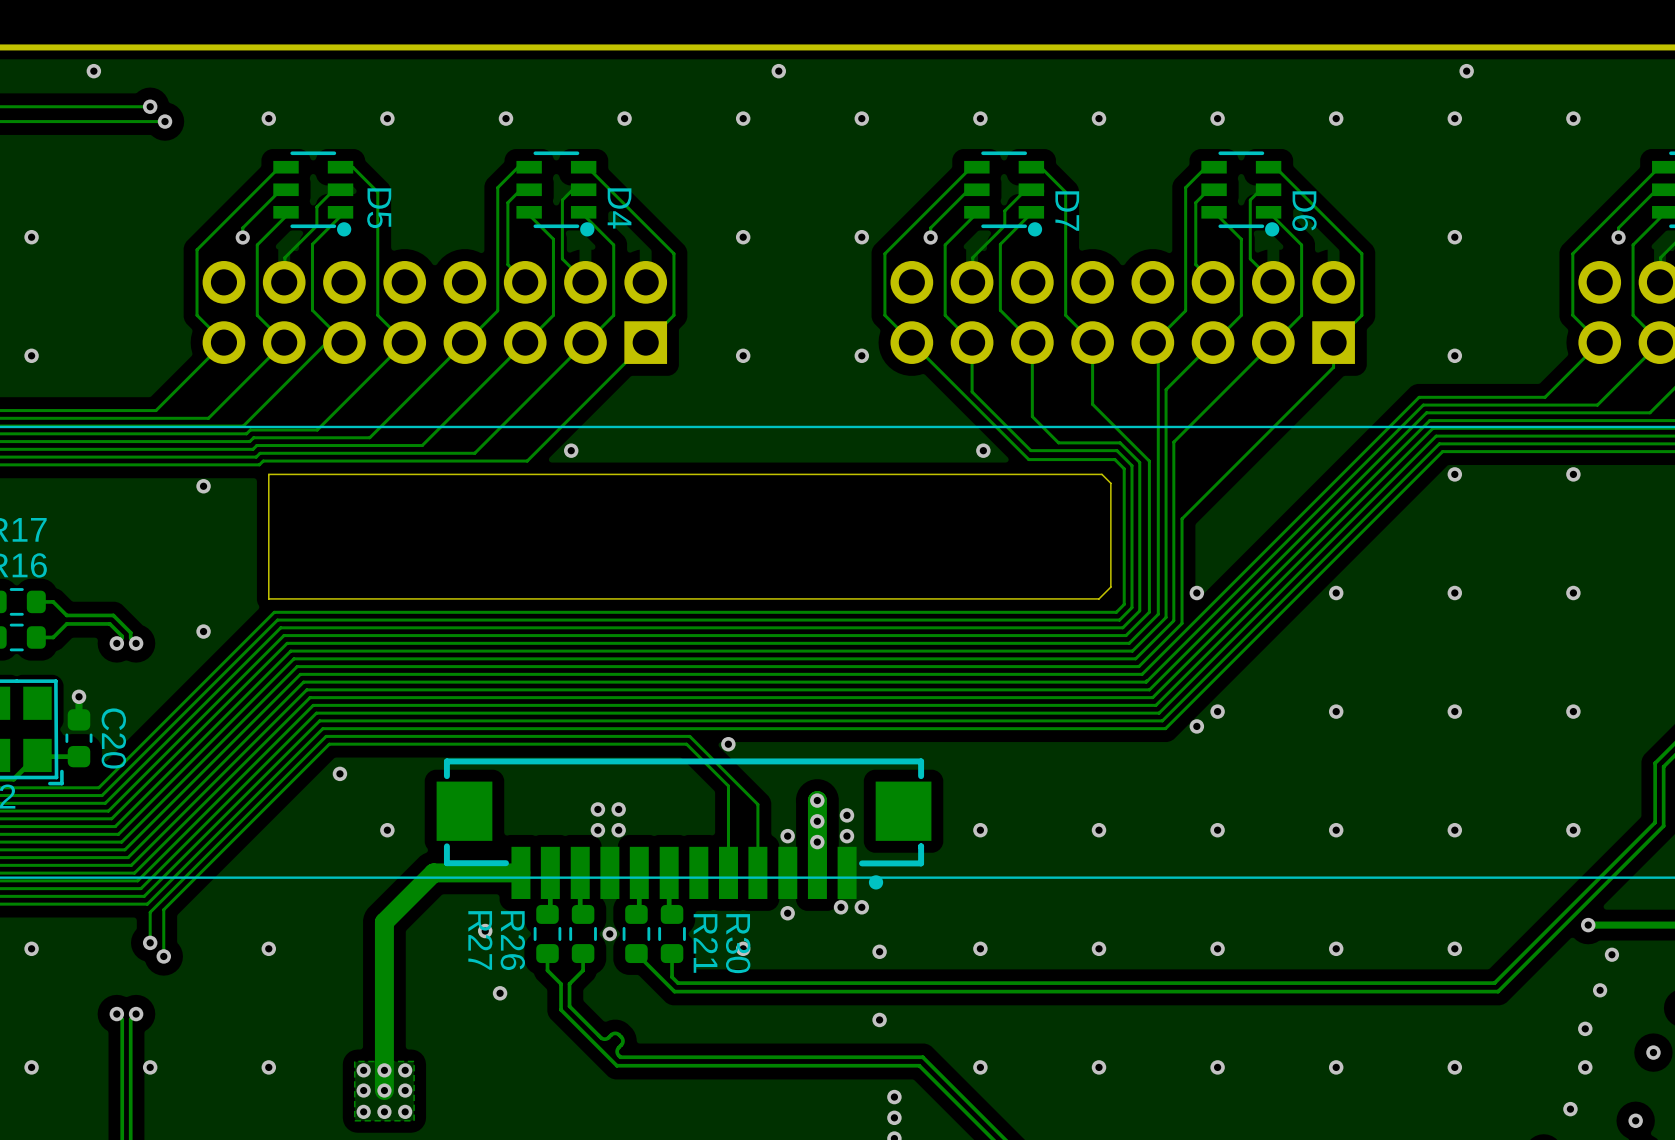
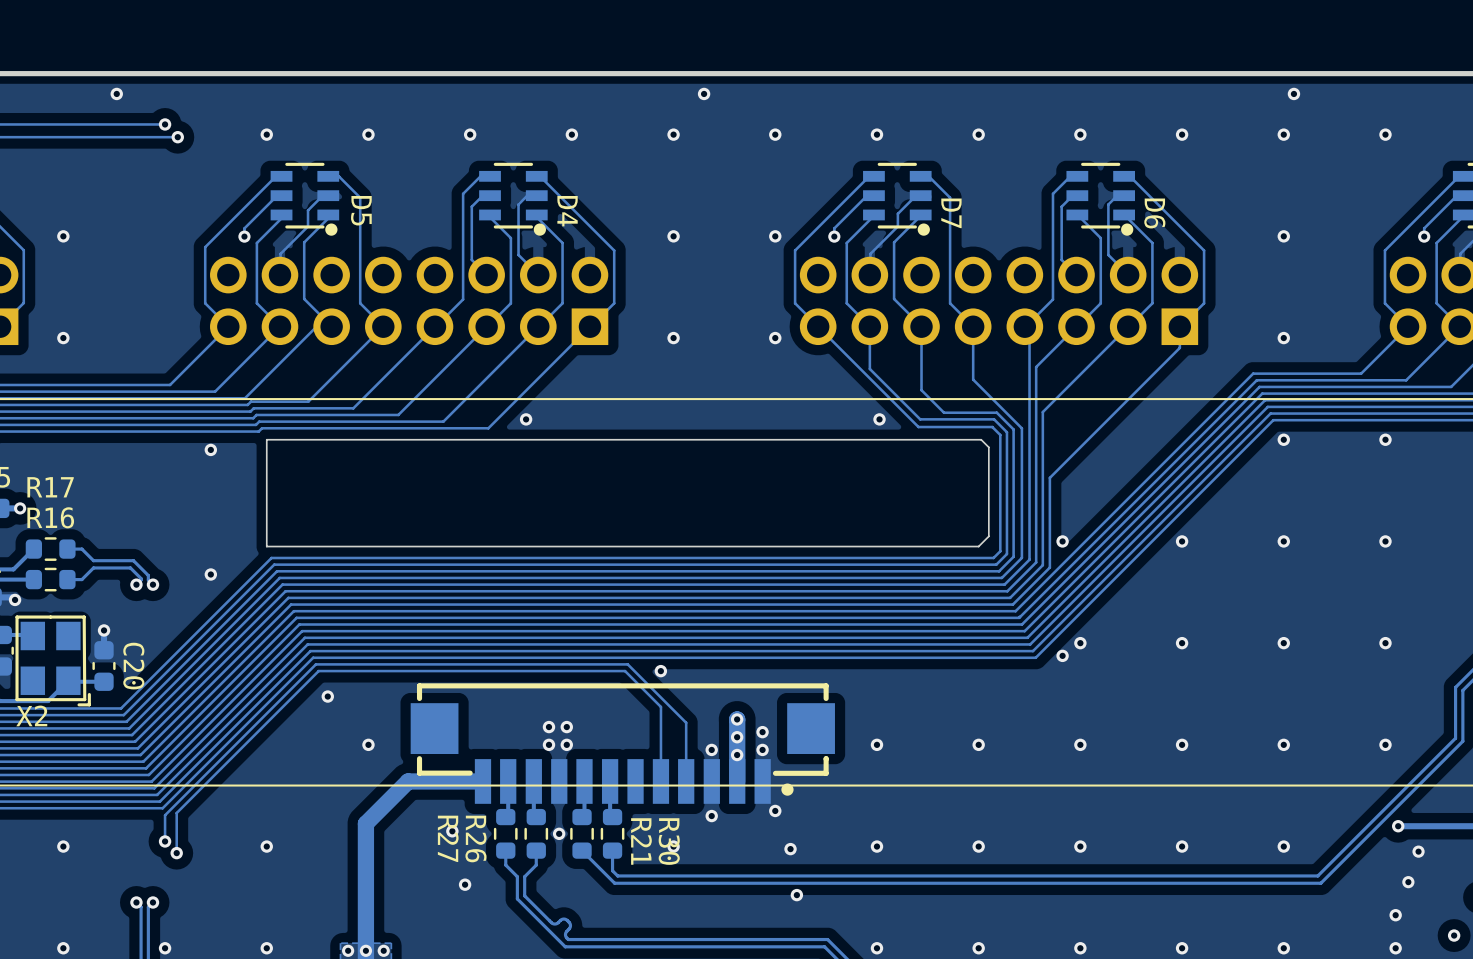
via: (841, 907) -> none
via position: (879, 1019) -> (796, 895)

